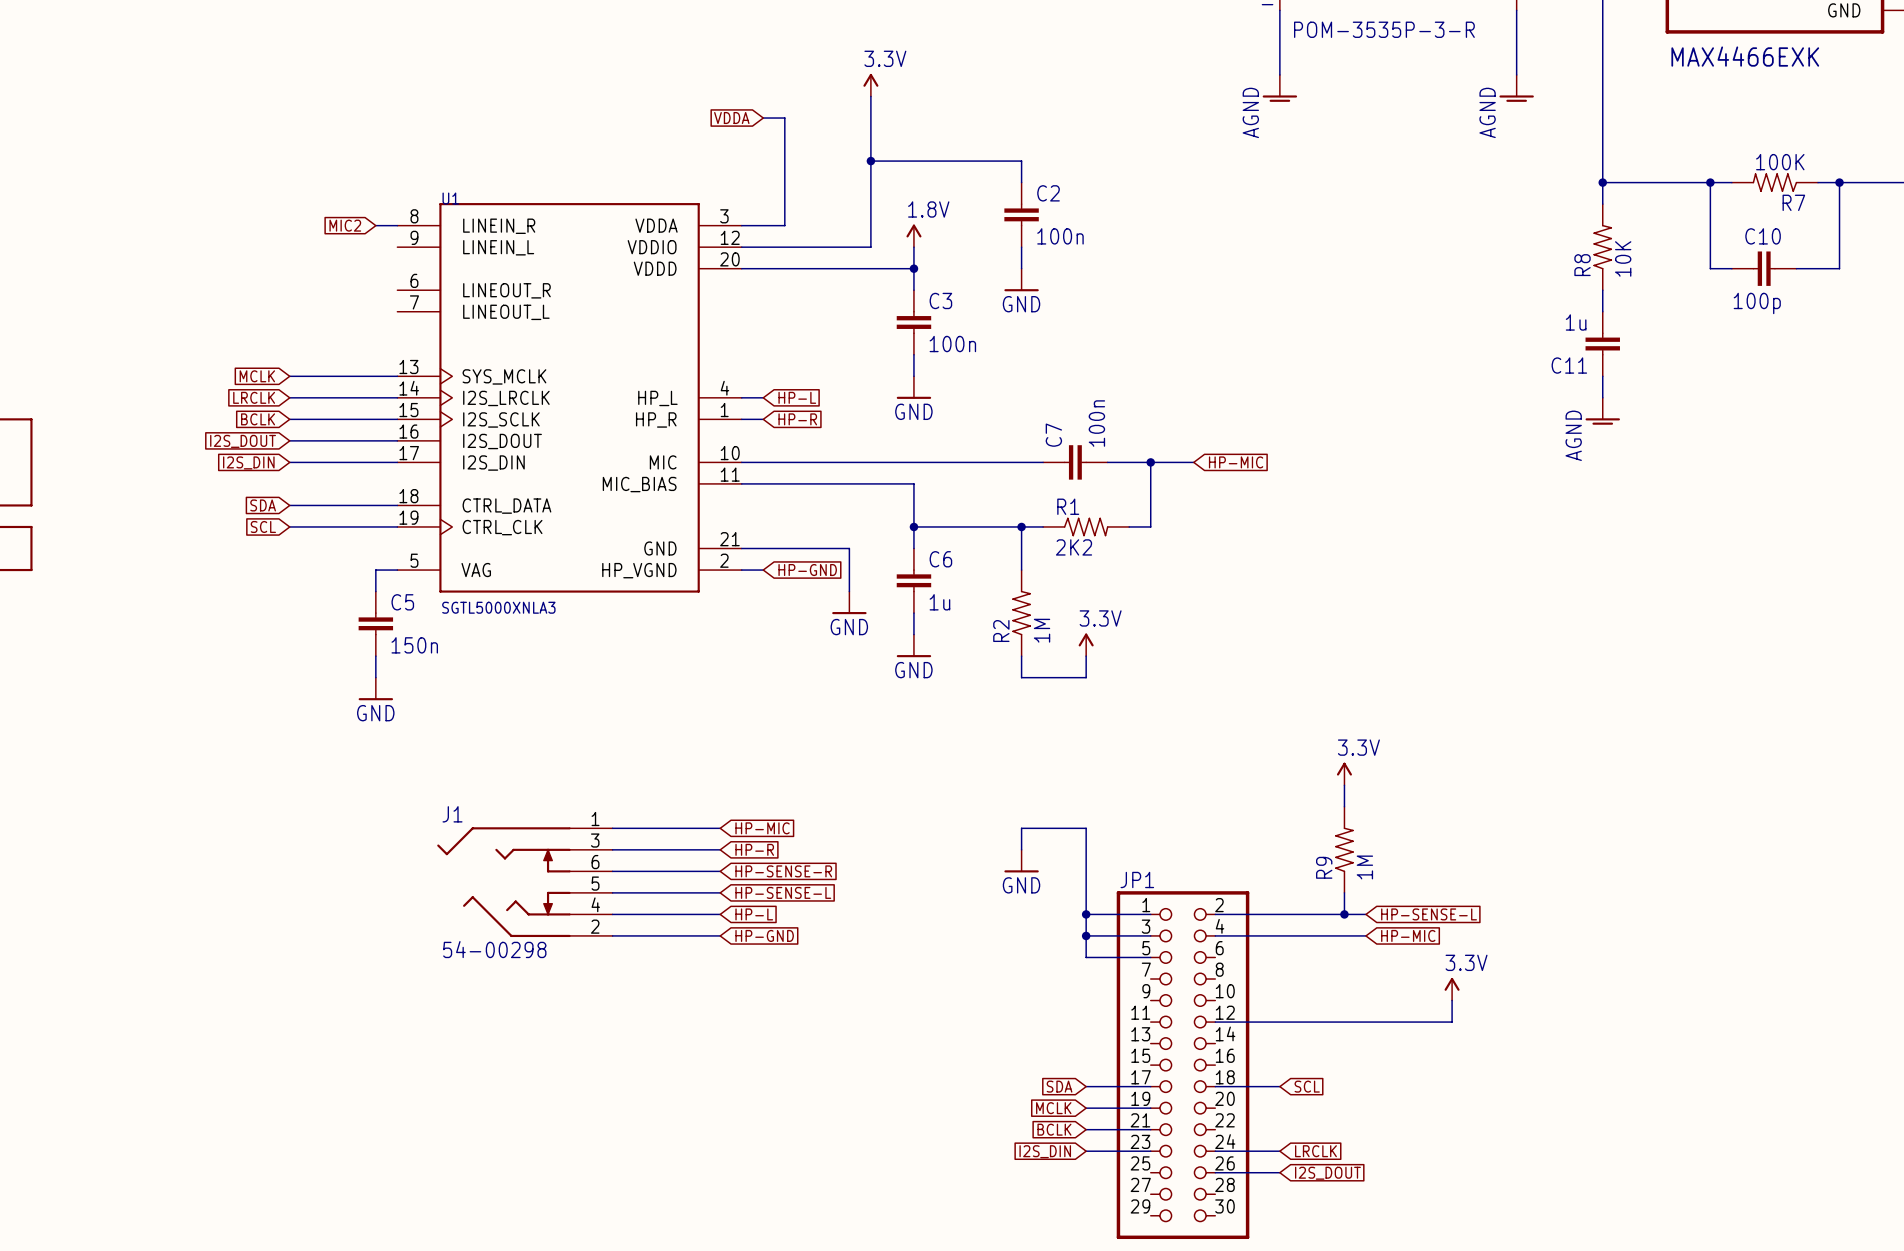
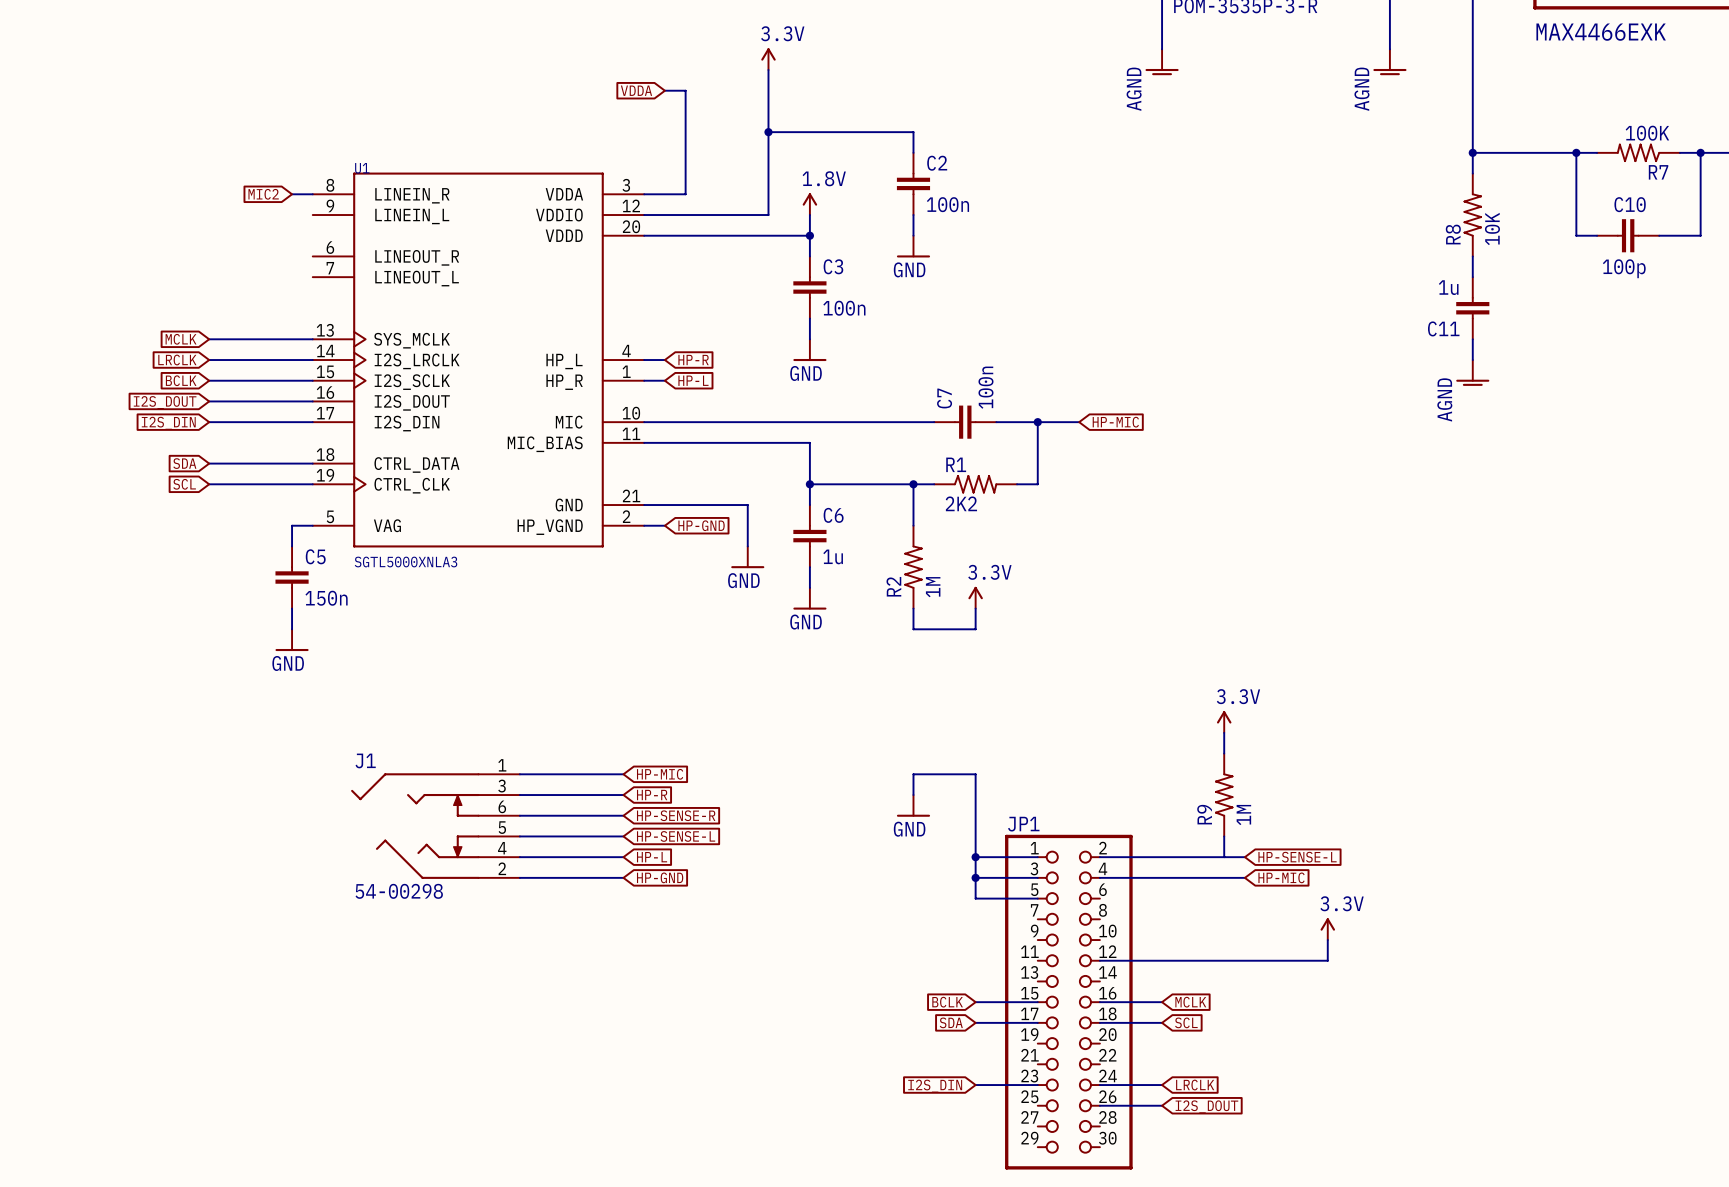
global label: HP-L (797, 397) -> HP-R (693, 360)
global label: HP-R (797, 419) -> HP-L (693, 380)
junction: (1344, 914) -> none
global label rotation: 0° (1053, 1108) -> 180° (1190, 1002)
global label position: MCLK (1053, 1108) -> MCLK (1190, 1002)
wire: (1086, 1108) (1150, 1108) -> (975, 1002) (1037, 1002)
global label position: BCLK (1054, 1129) -> BCLK (947, 1002)
wire: (1086, 1129) (1150, 1129) -> (1099, 1002) (1162, 1002)

